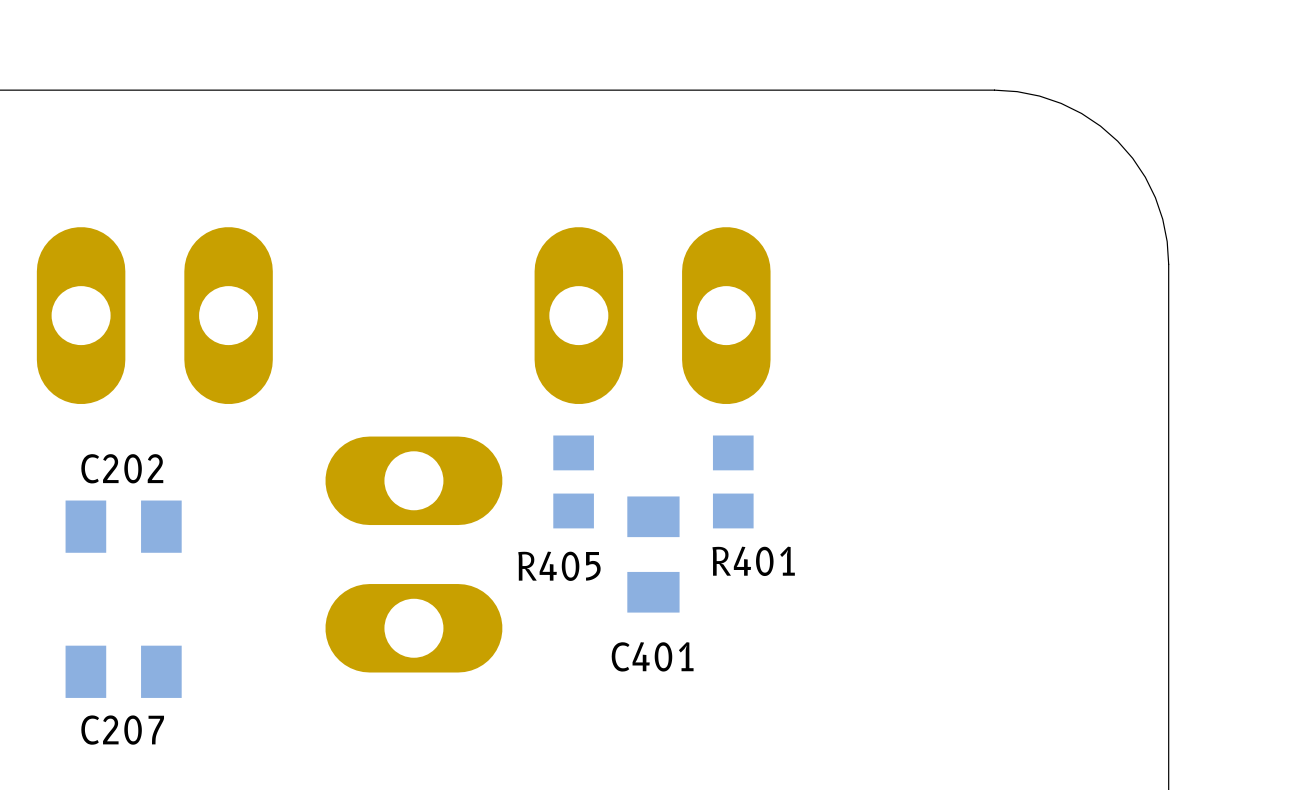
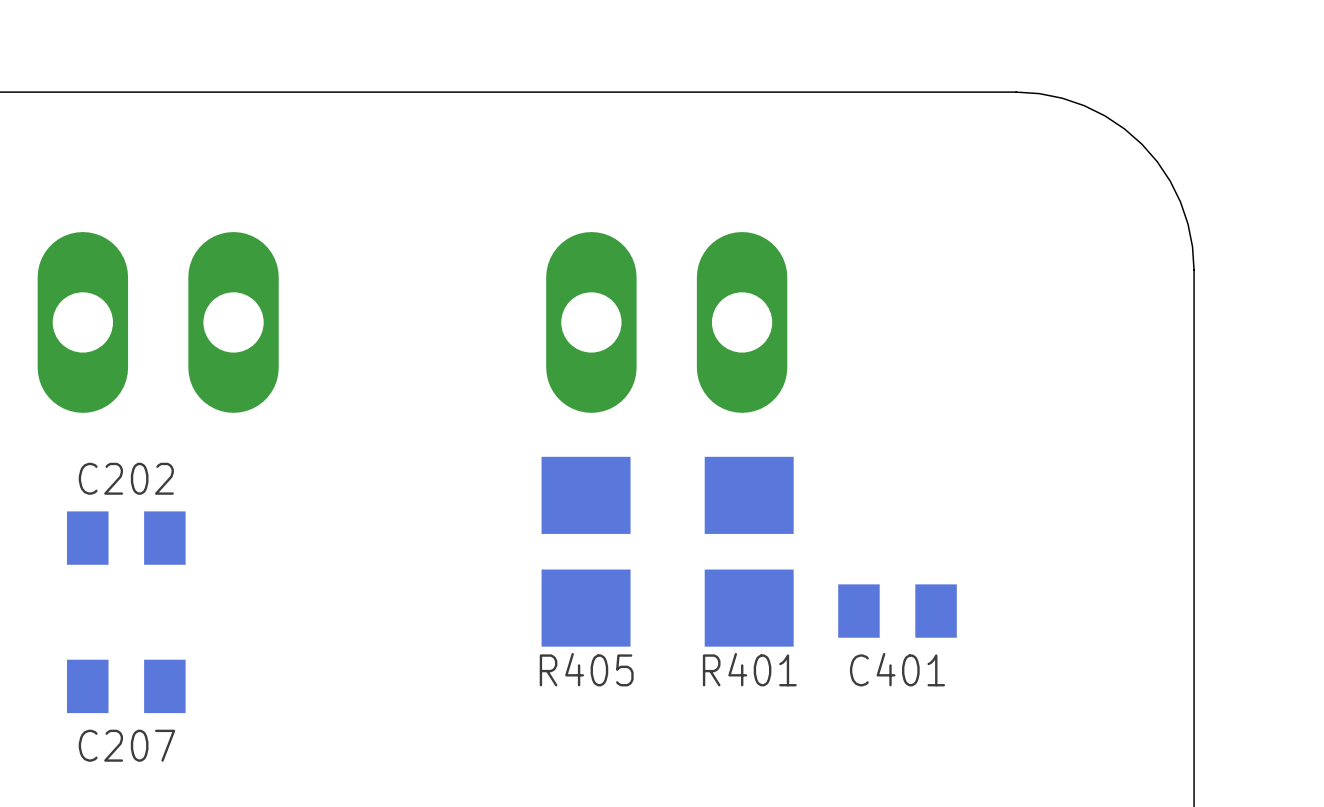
R405 footprint: [553, 435, 594, 529] -> [541, 456, 631, 647]
R401 footprint: [712, 435, 754, 529] -> [704, 456, 794, 647]
part: (413, 554) -> none
C401 rotation: 0° (653, 554) -> 90° clockwise (897, 611)
C401 position: (653, 554) -> (897, 611)

